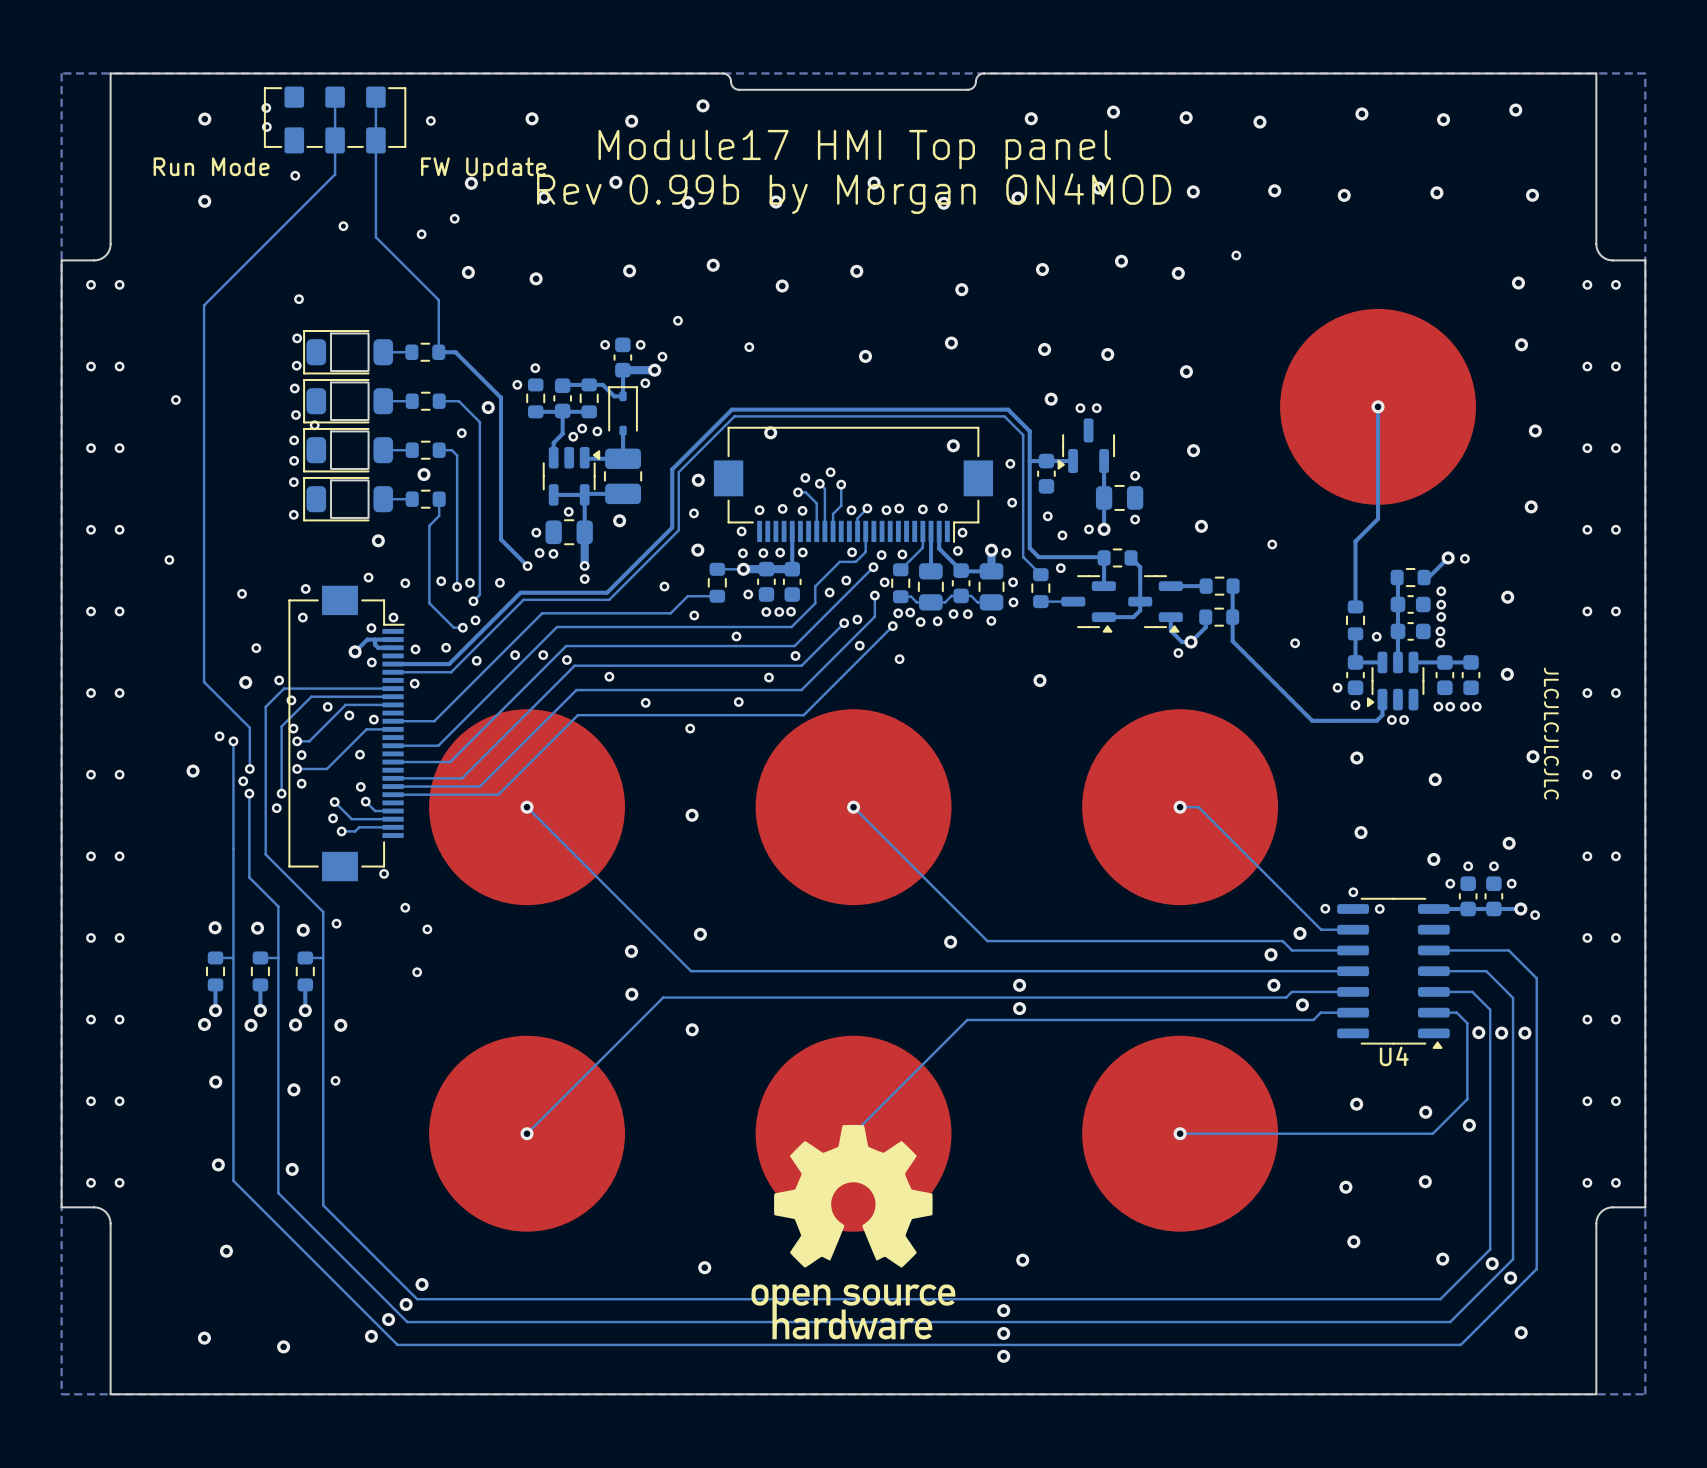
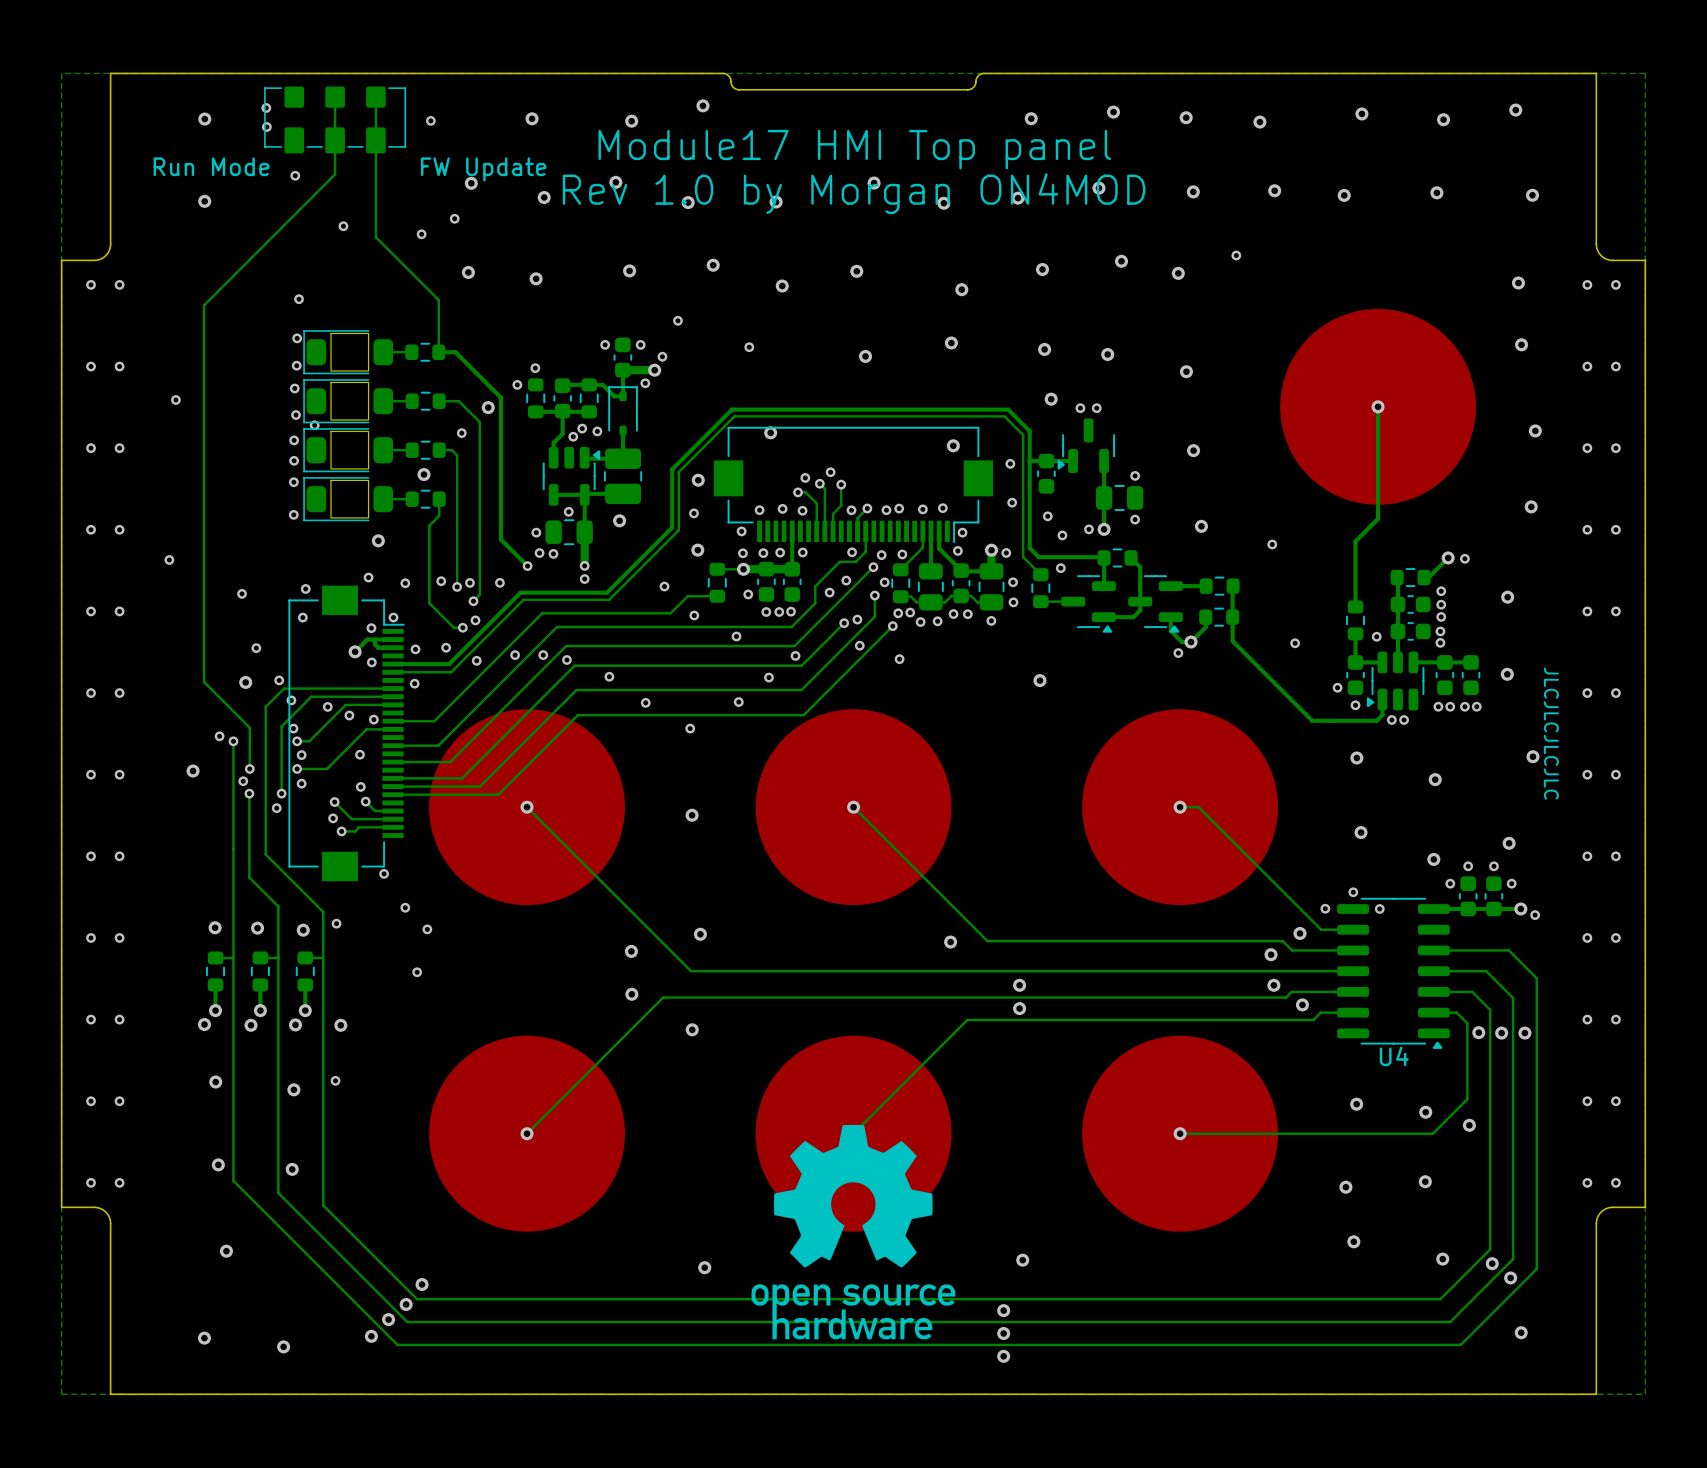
text: Rev 0.99b by Morgan ON4MOD (854, 193) -> Rev 1.0 by Morgan ON4MOD (854, 193)

